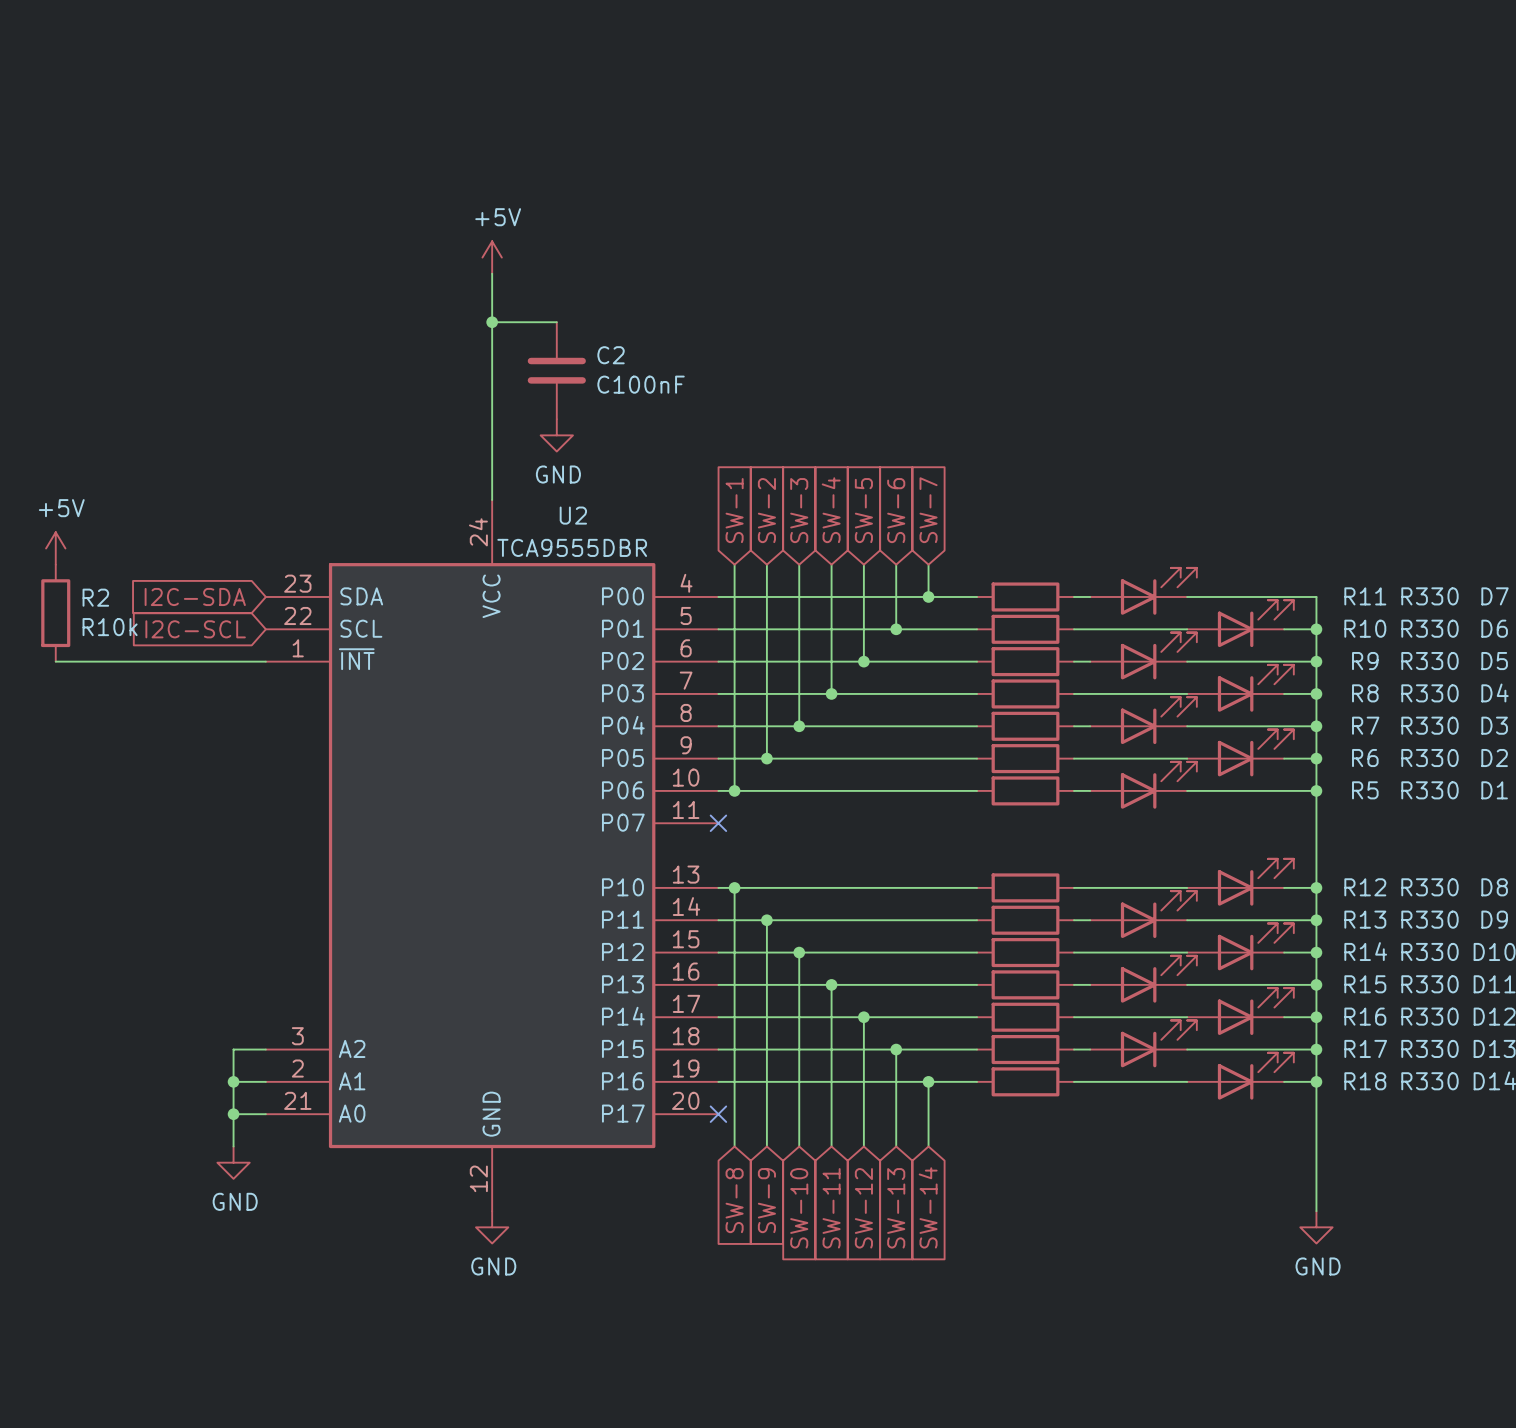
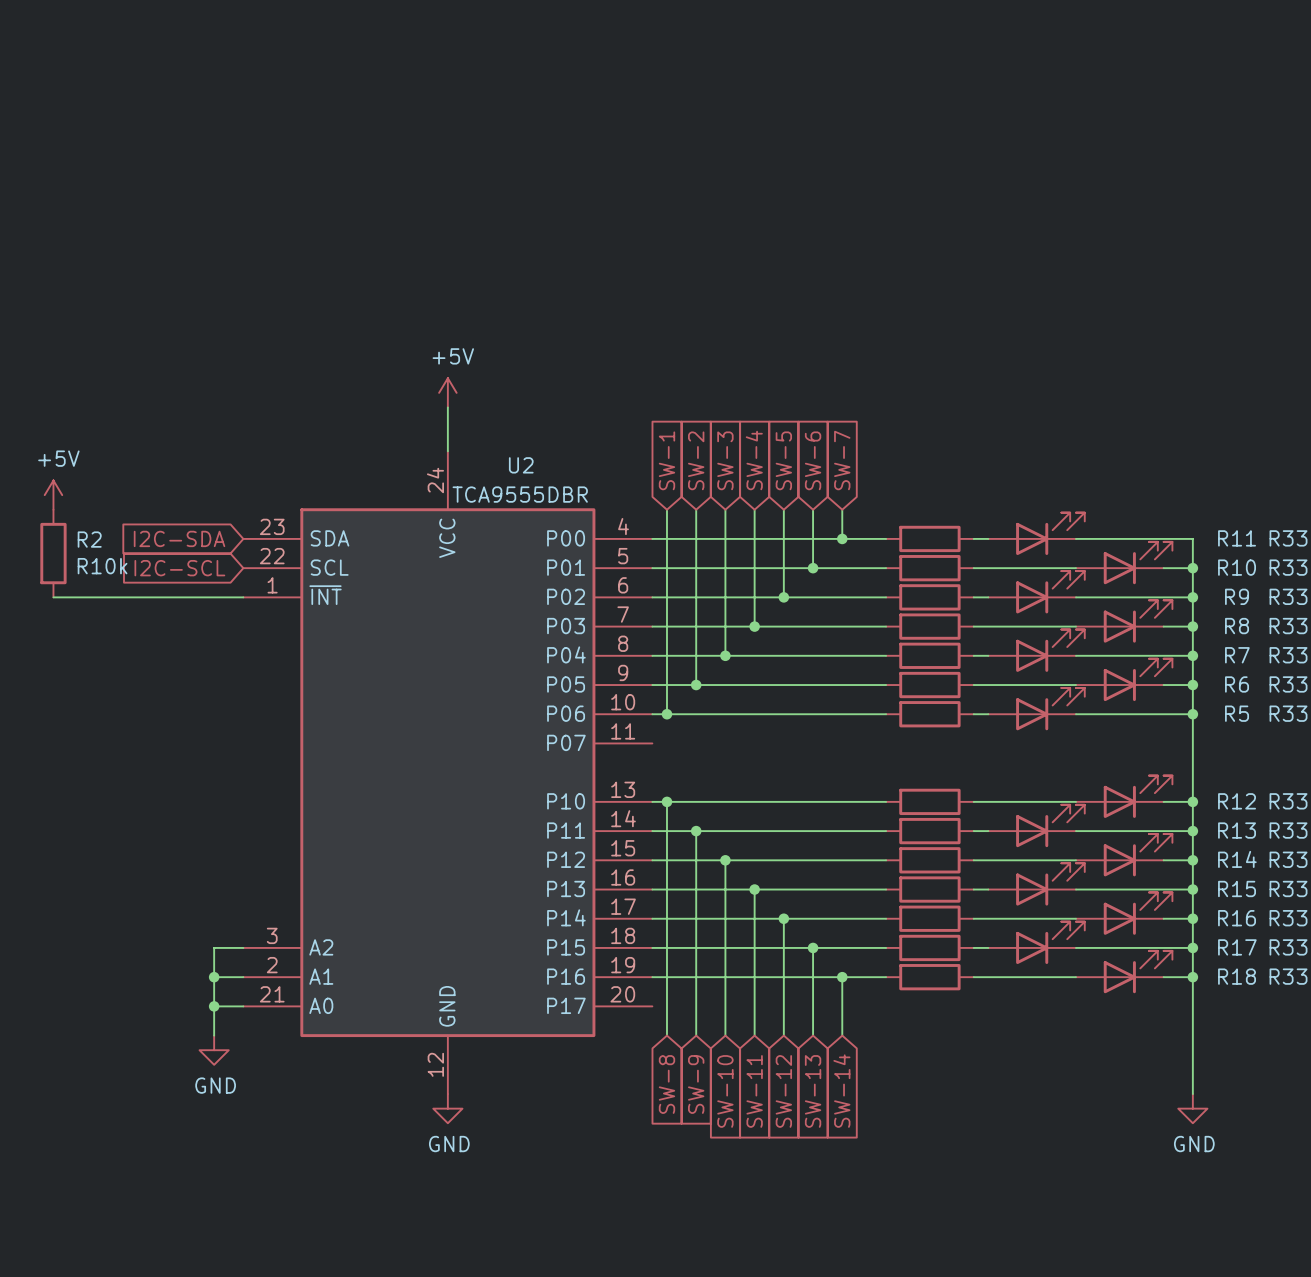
power symbol position: +5V (492, 257) -> +5V (447, 392)
wire: (492, 273) (492, 451) -> none
wire: (492, 322) (556, 322) -> none
junction: (492, 322) -> none
C2: C100nF (556, 370) -> none
power symbol: GND (556, 435) -> none
no-connect mark: (718, 823) -> none
no-connect mark: (718, 1114) -> none

